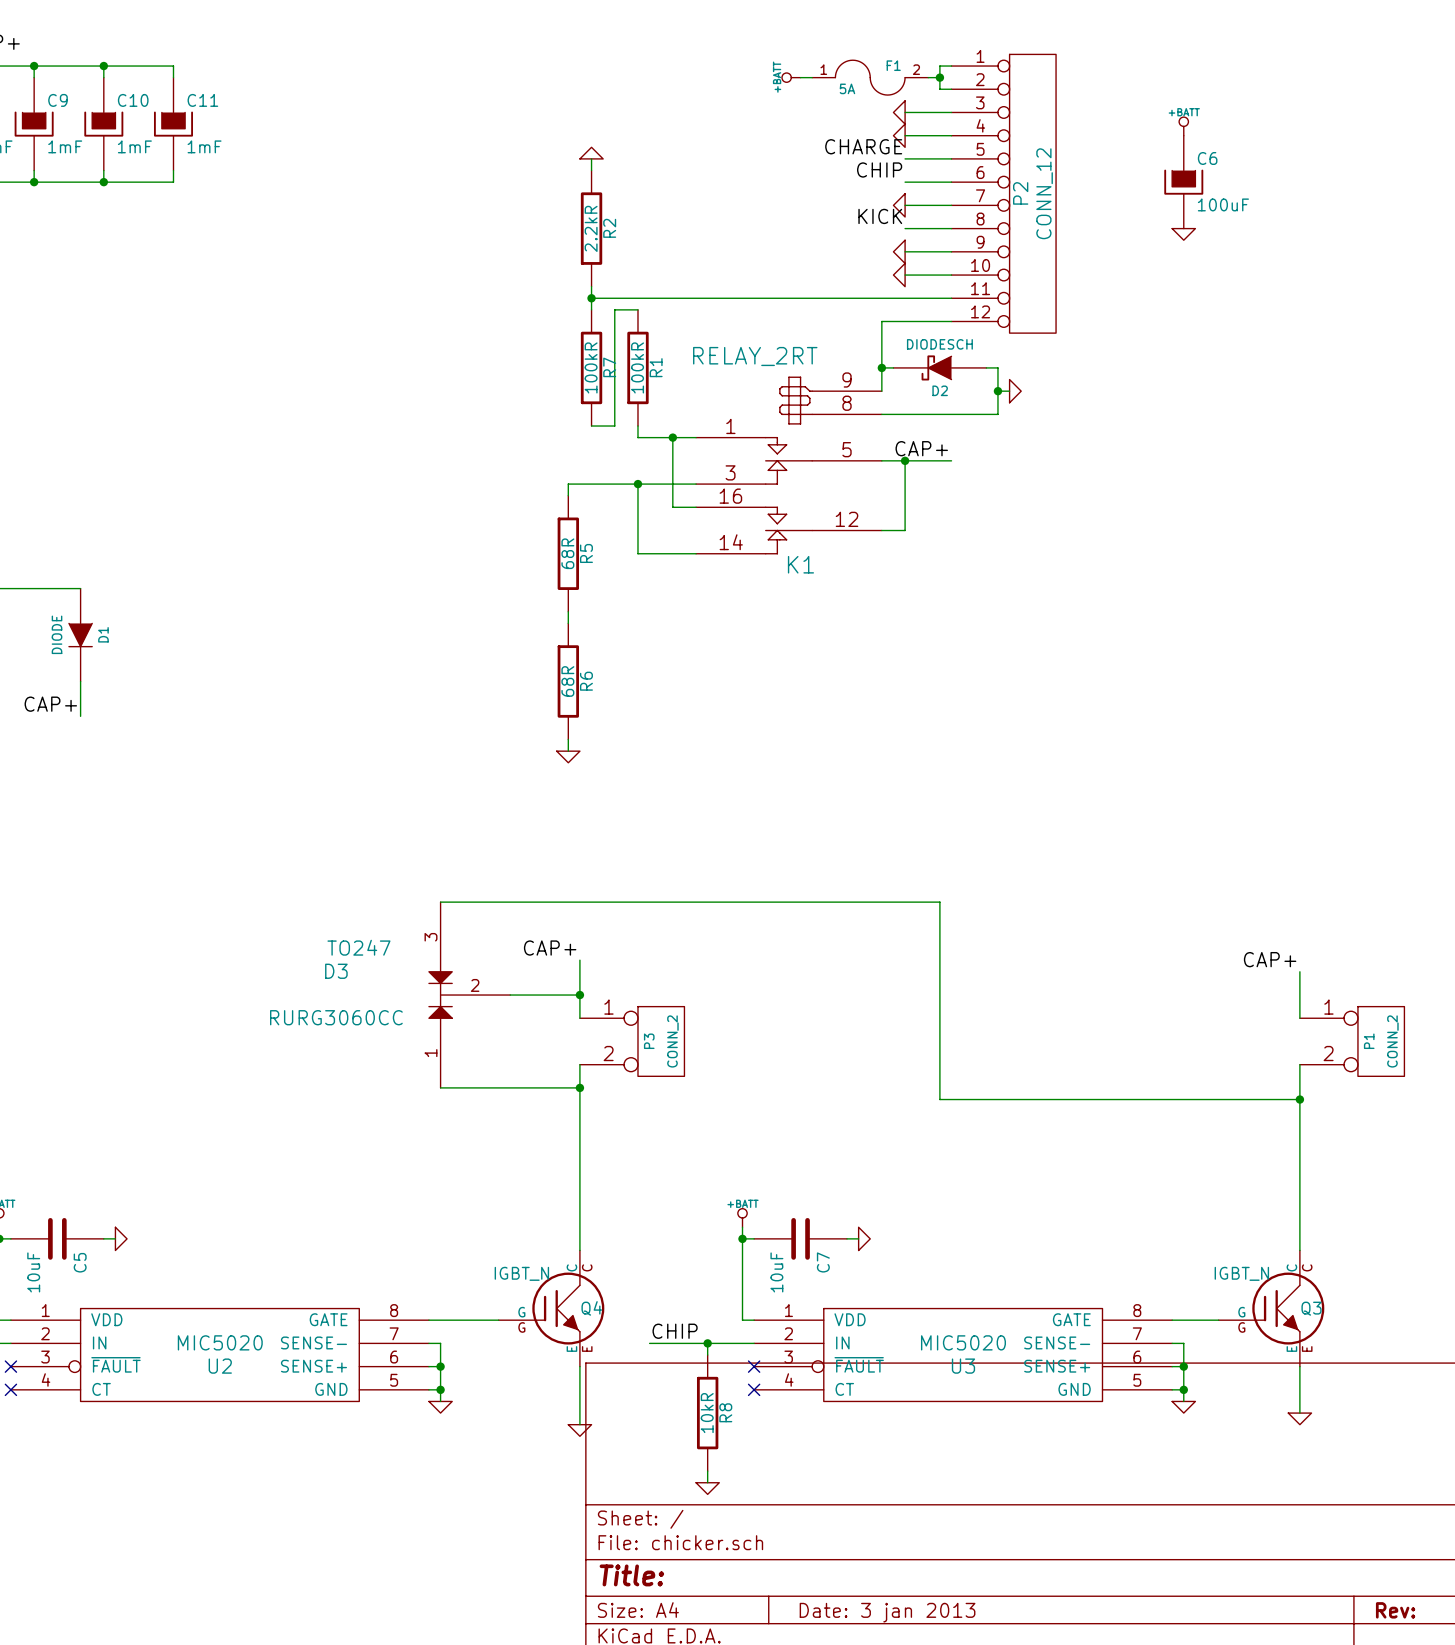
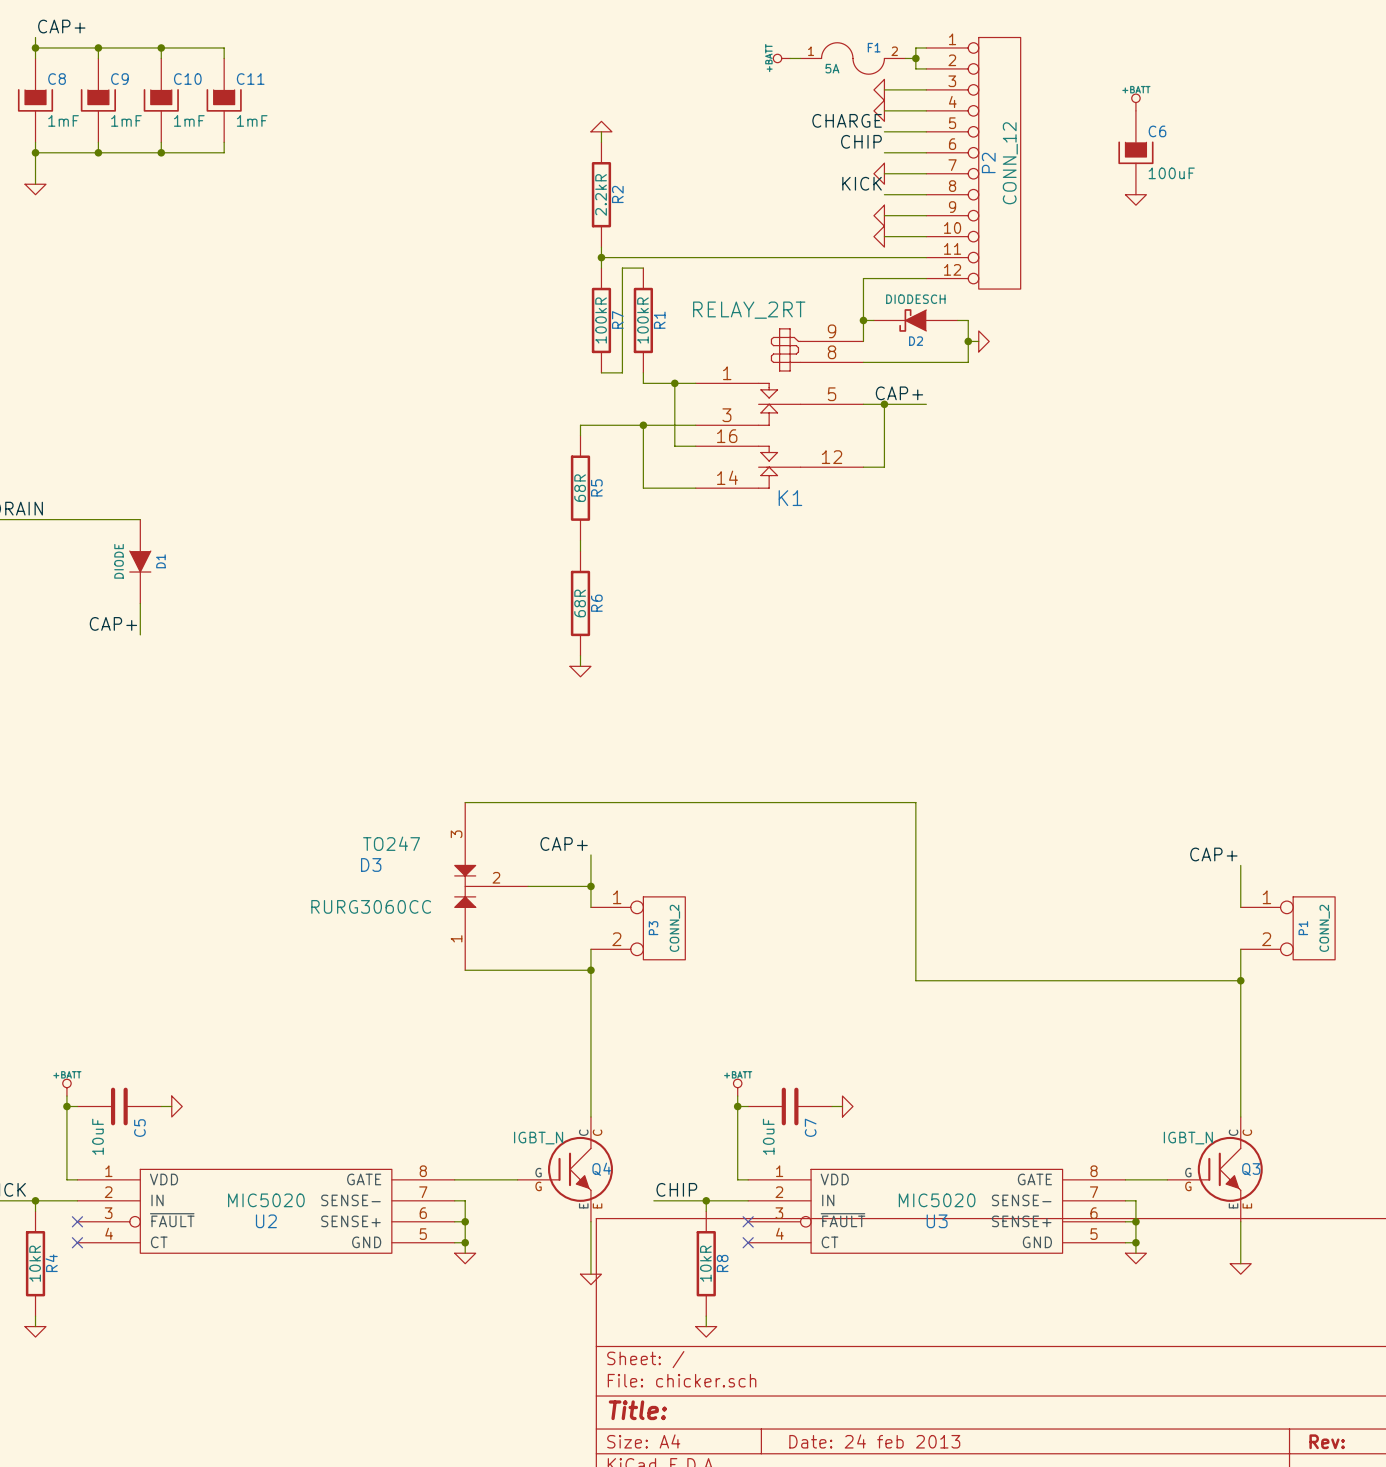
title block: Date: 3 jan 2013 (887, 1612) -> Date: 24 feb 2013 (874, 1441)

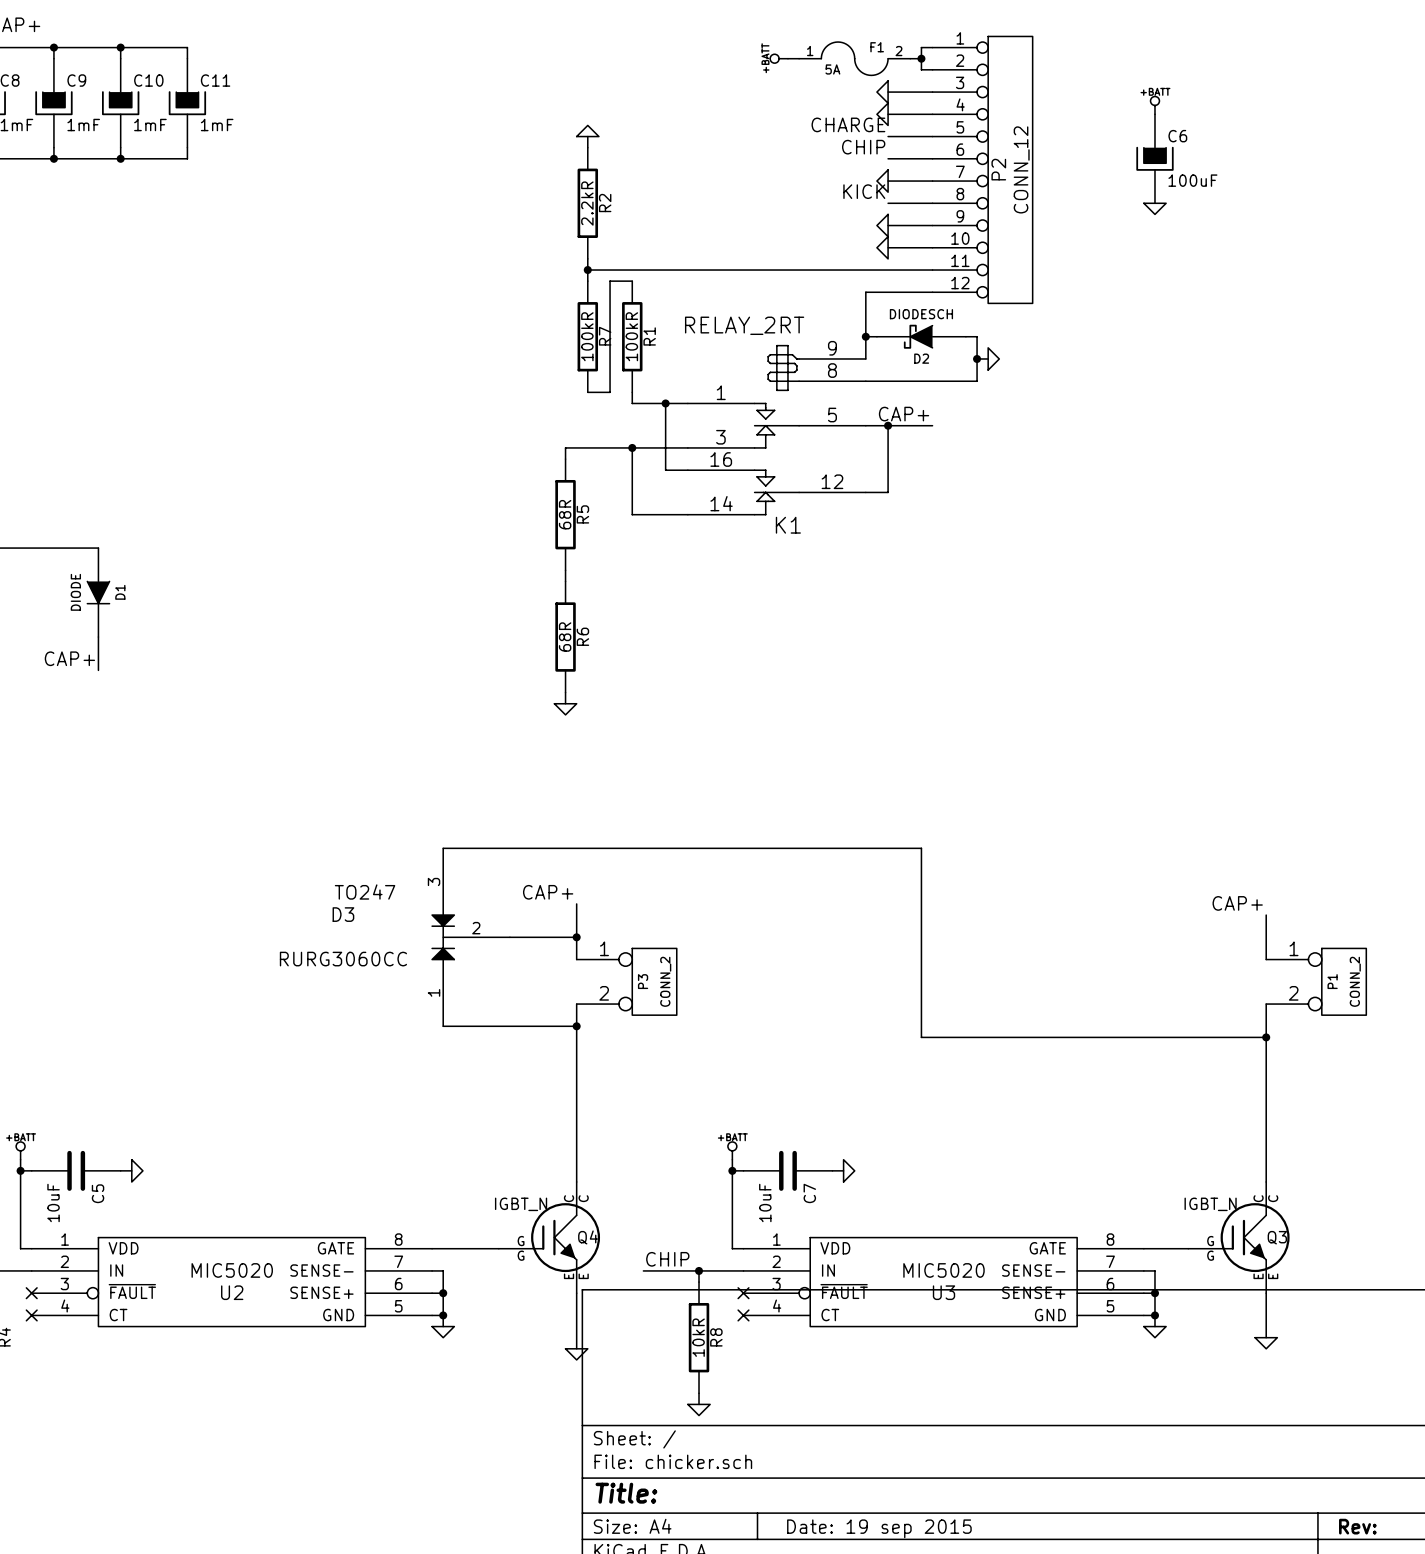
title block: Date: 24 feb 2013 (874, 1441) -> Date: 19 sep 2015 (879, 1528)

